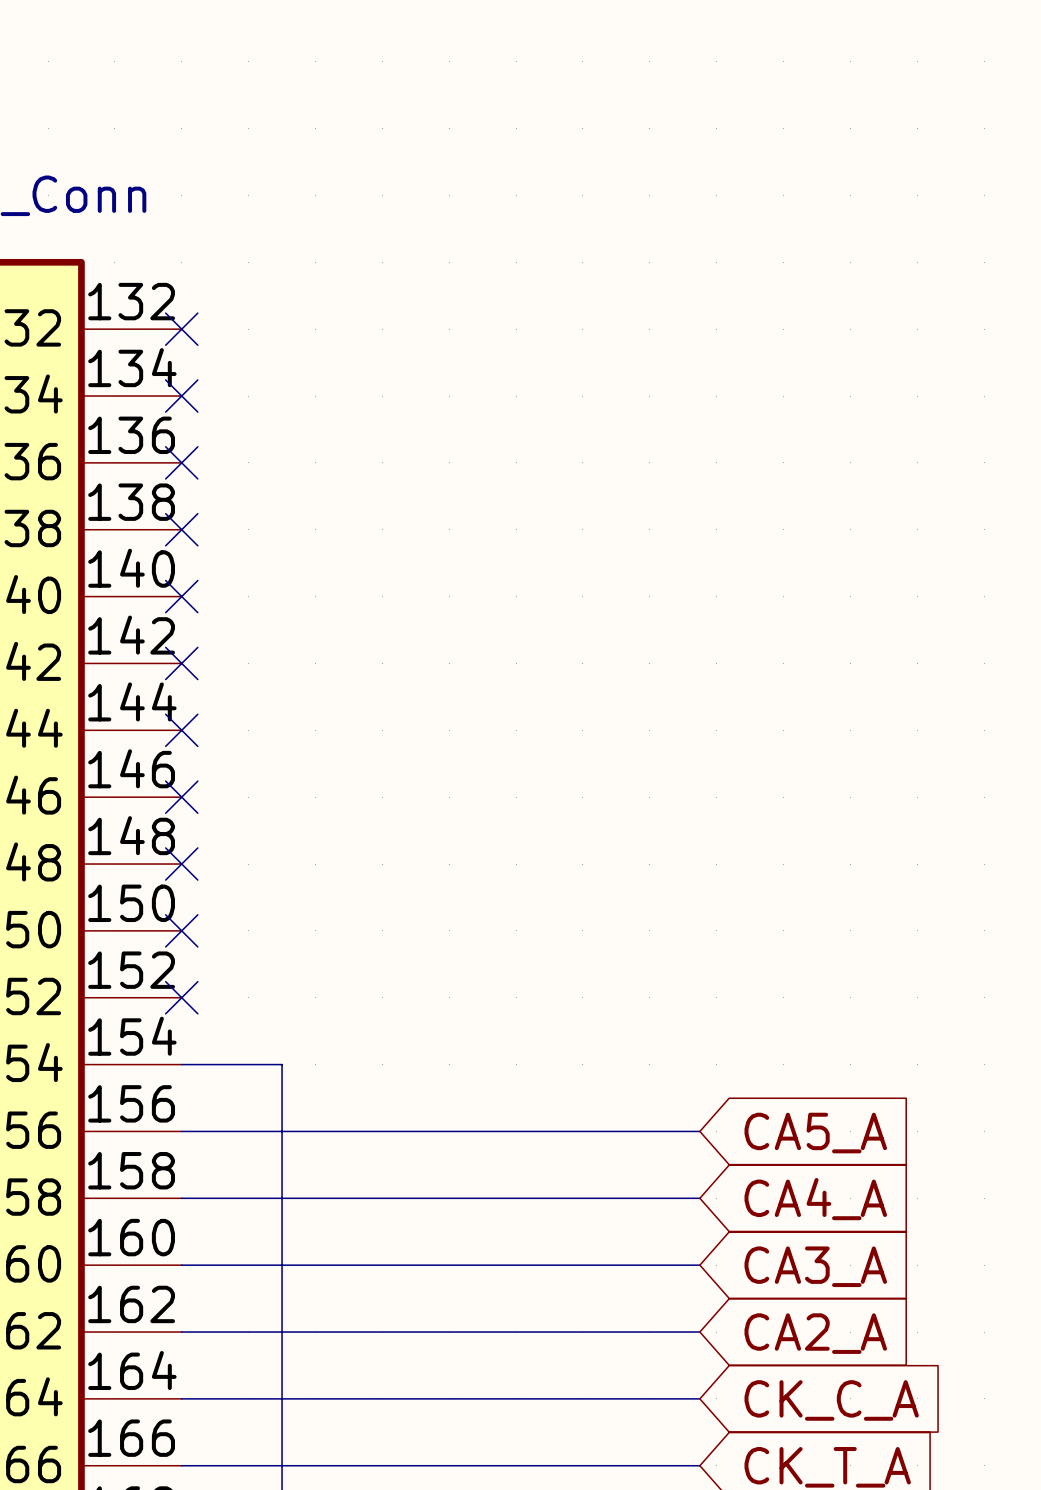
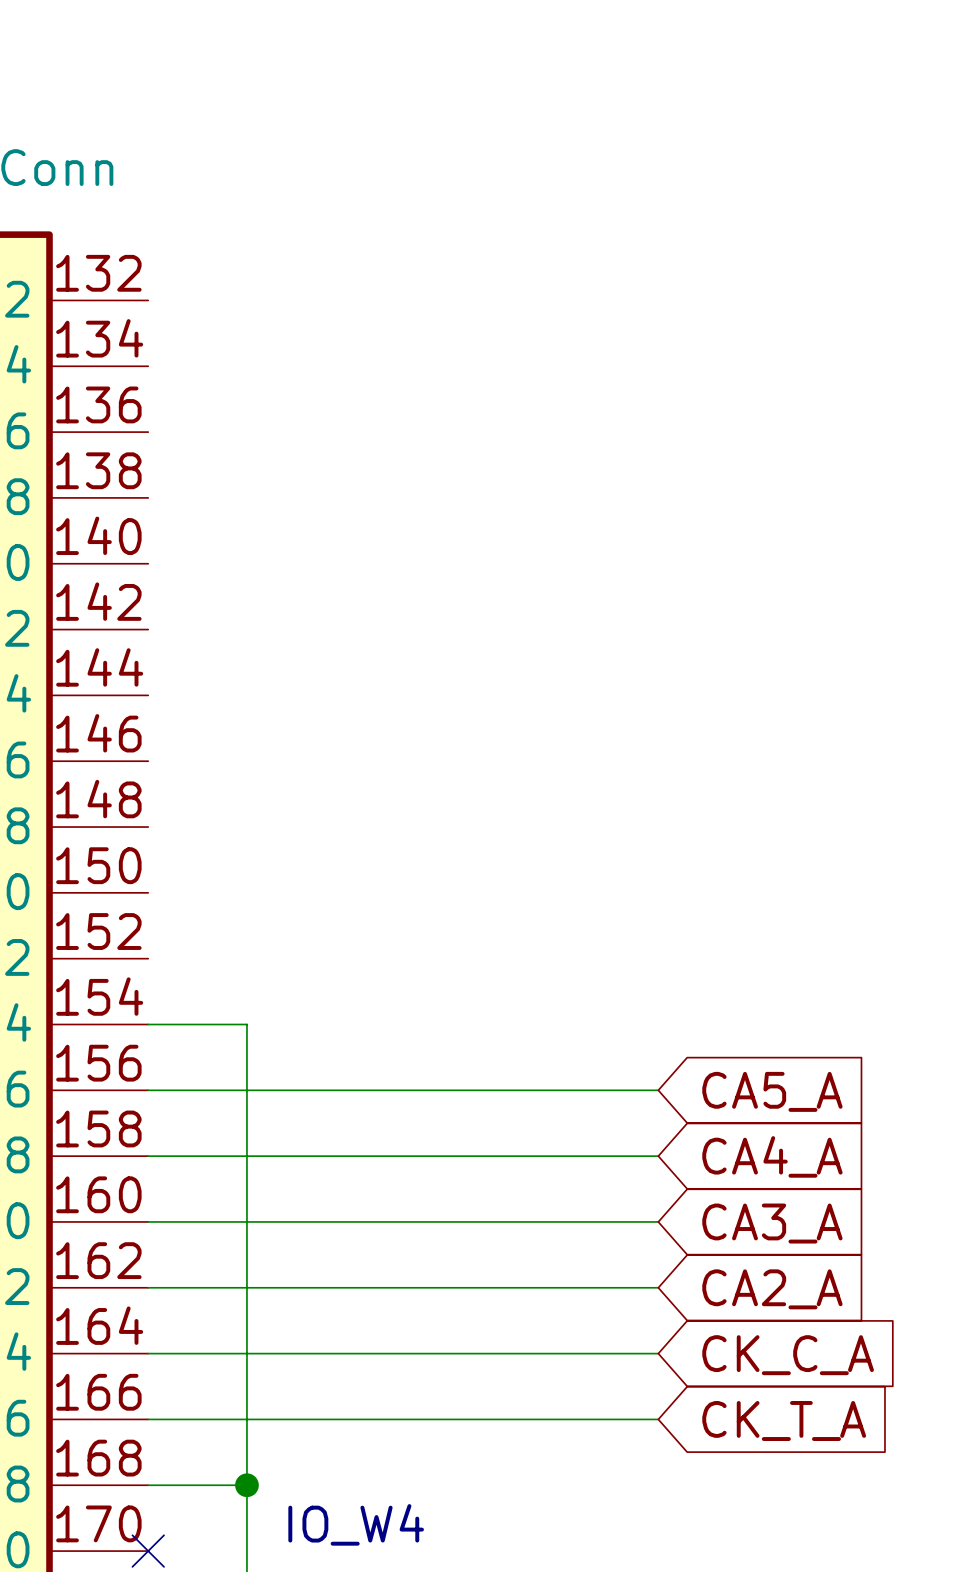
no-connect mark: (181, 329) -> none
no-connect mark: (181, 396) -> none
no-connect mark: (181, 462) -> none
no-connect mark: (181, 529) -> none
no-connect mark: (181, 596) -> none
no-connect mark: (181, 663) -> none
no-connect mark: (181, 730) -> none
no-connect mark: (181, 797) -> none
no-connect mark: (181, 864) -> none
no-connect mark: (181, 930) -> none
no-connect mark: (181, 997) -> none

